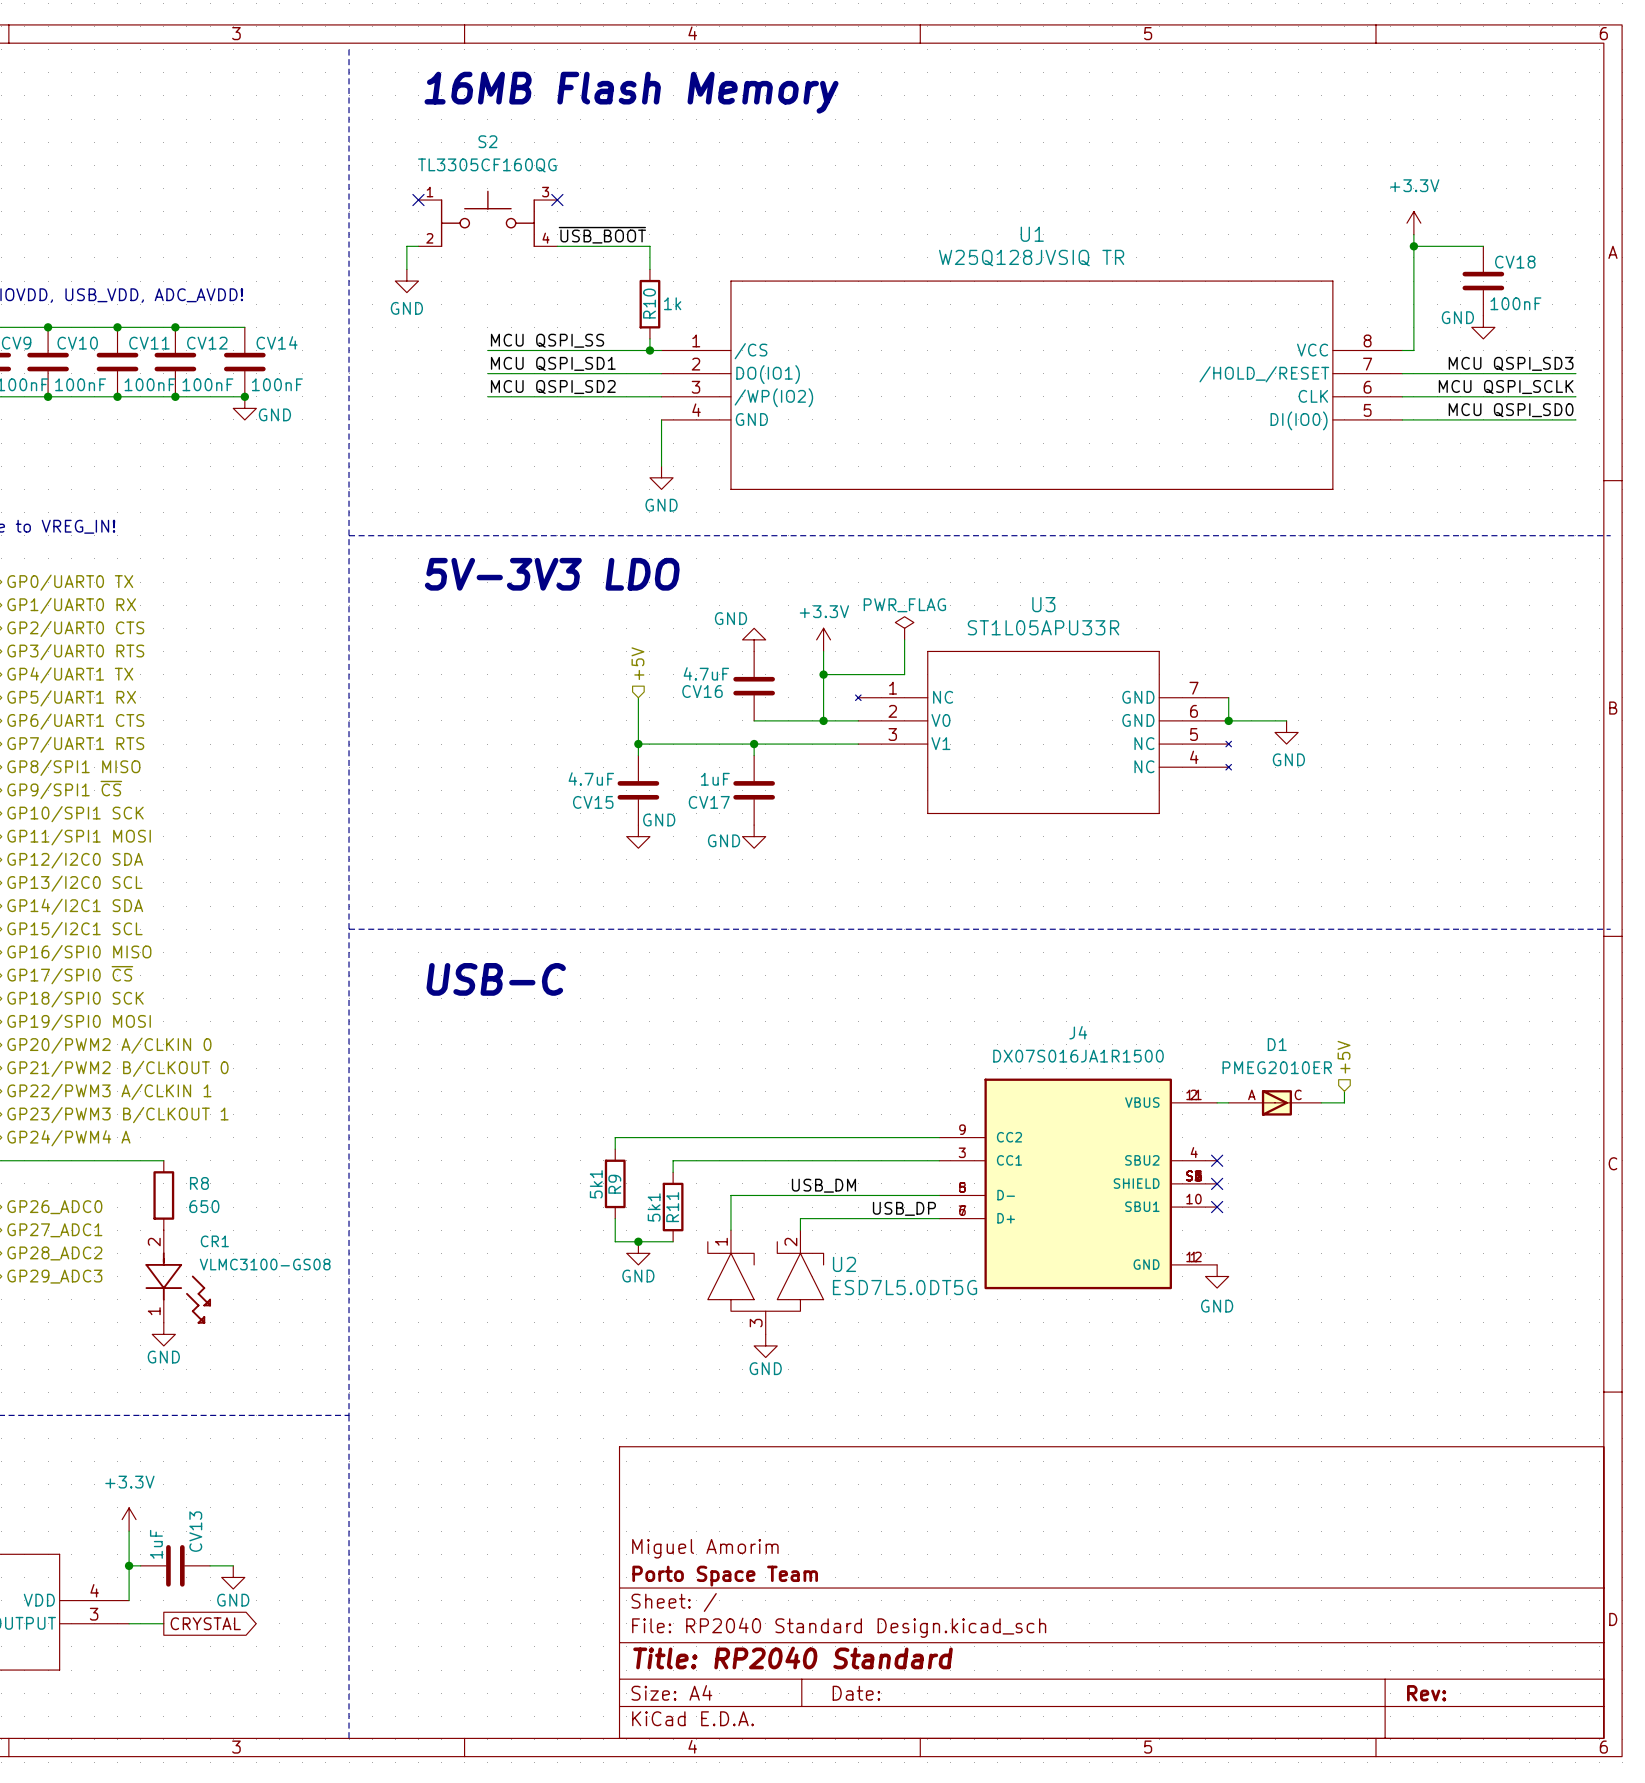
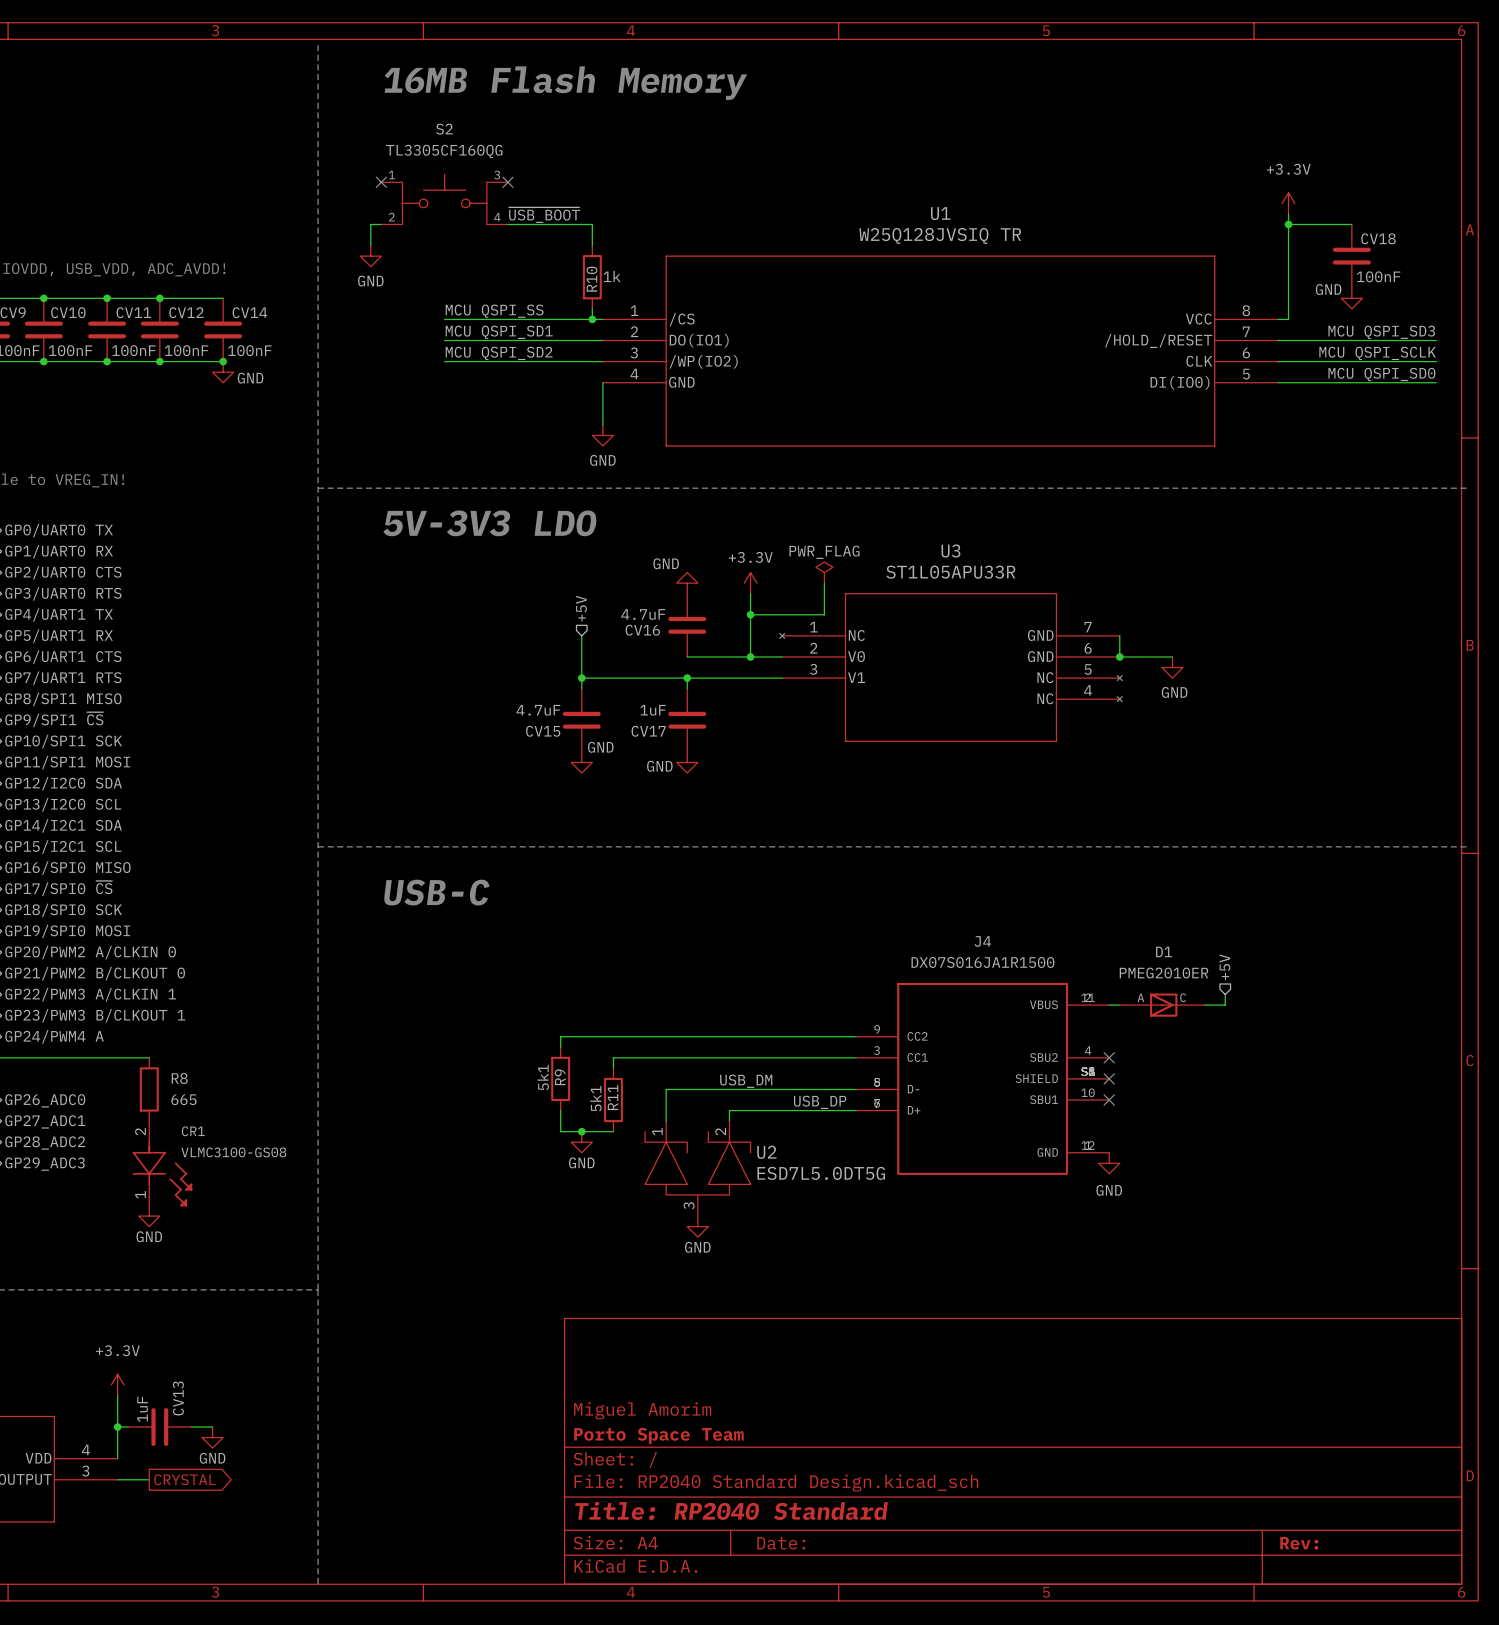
R8 value: 650 (204, 1206) -> 665 (183, 1099)

